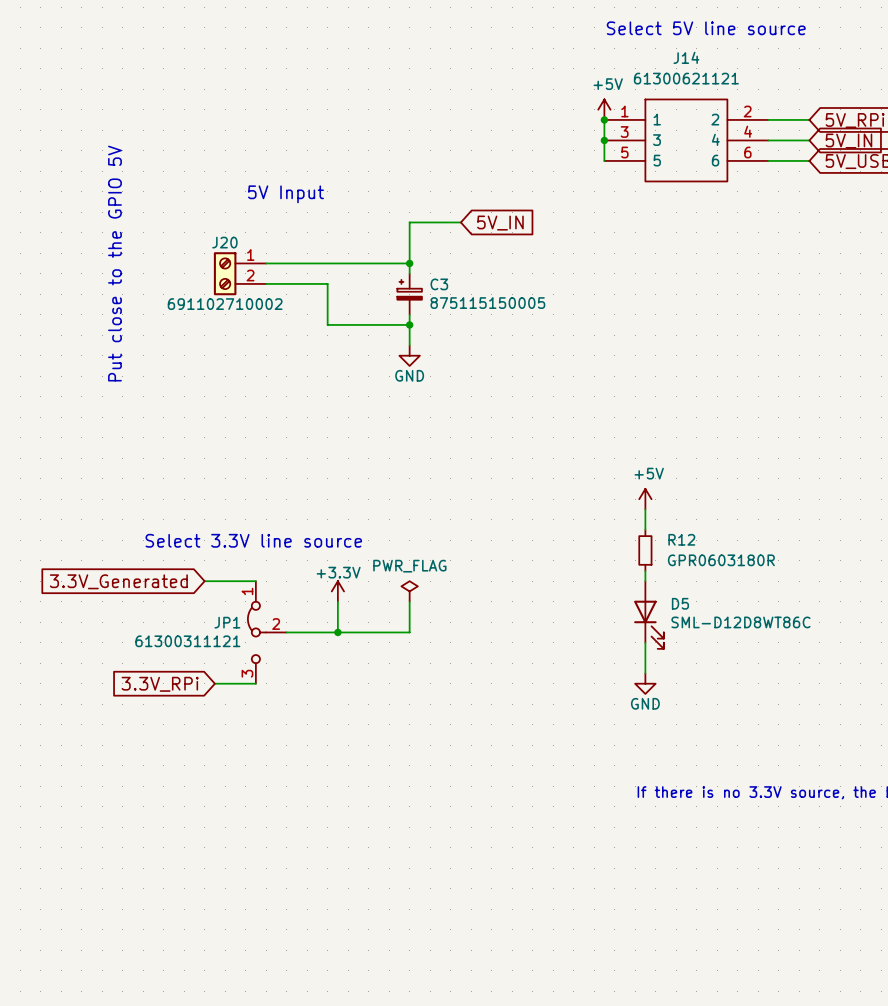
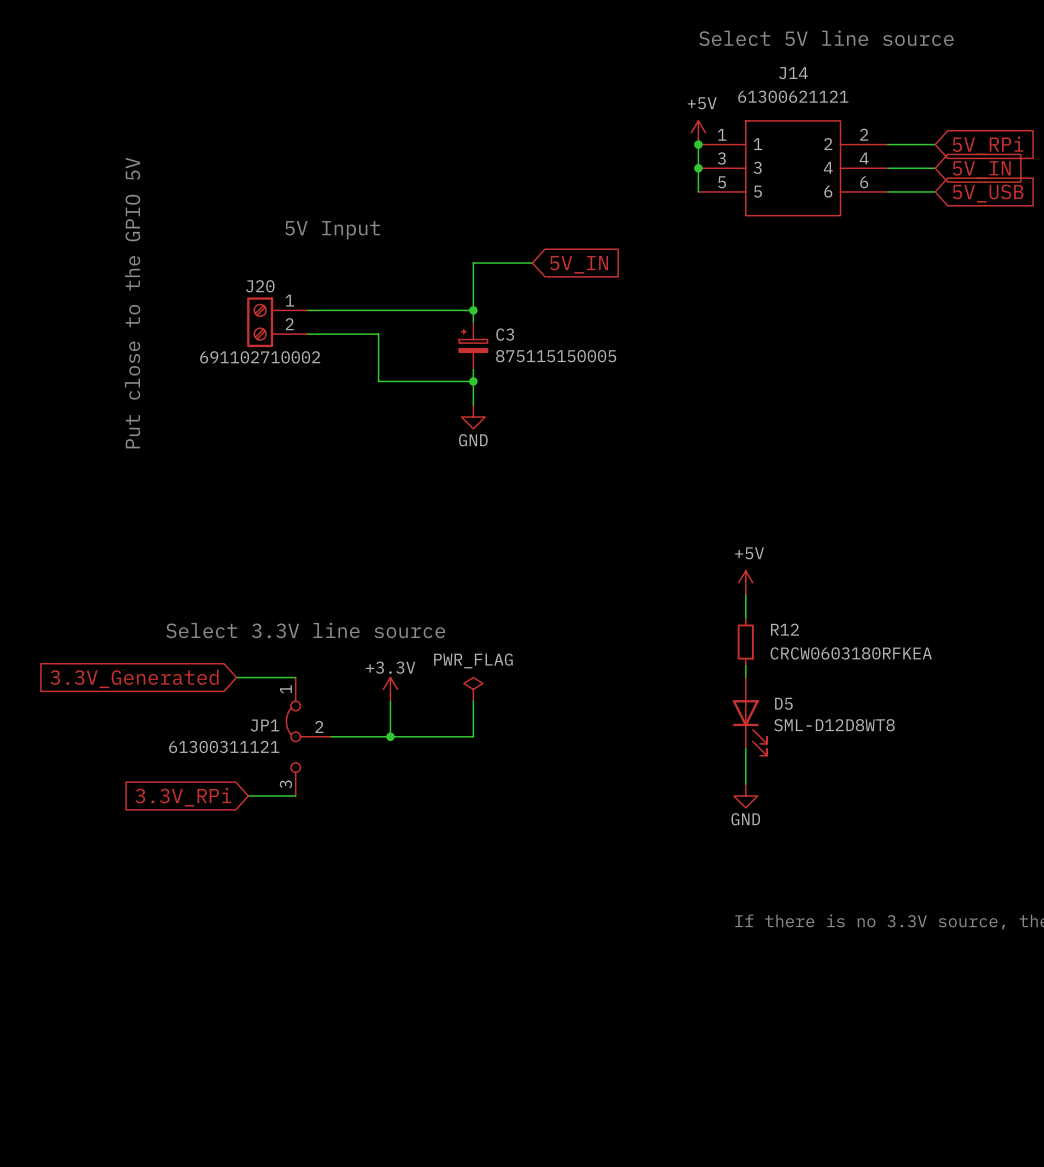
R12 value: GPR0603180R (721, 560) -> CRCW0603180RFKEA (851, 653)
D5 value: SML-D12D8WT86C (740, 622) -> SML-D12D8WT8 (834, 725)

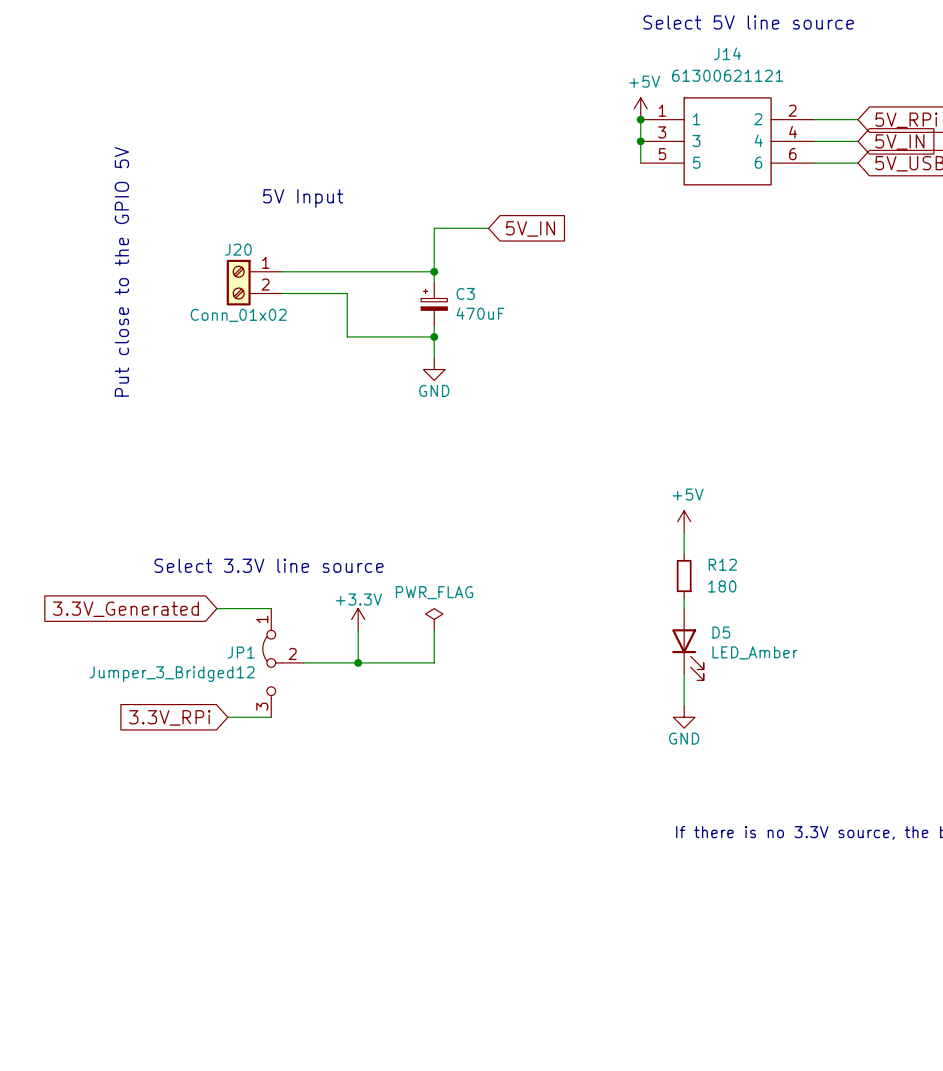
C3 value: 875115150005 (556, 356) -> 470uF (480, 313)
J20 value: 691102710002 (260, 357) -> Conn_01x02 (238, 315)
R12 value: CRCW0603180RFKEA (851, 653) -> 180 (722, 586)
D5 value: SML-D12D8WT8 (834, 725) -> LED_Amber (754, 652)
JP1 value: 61300311121 (224, 747) -> Jumper_3_Bridged12 (171, 674)

